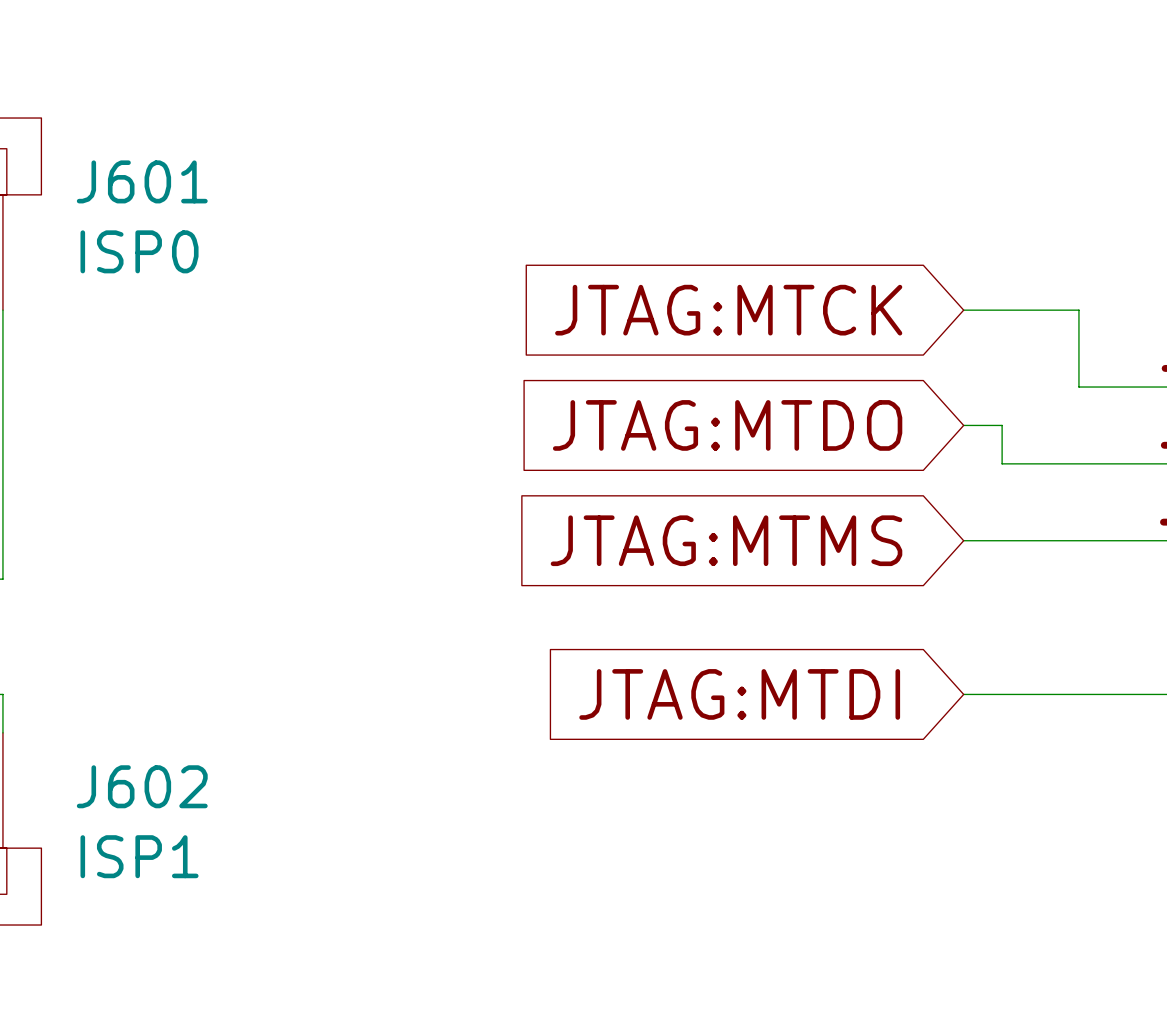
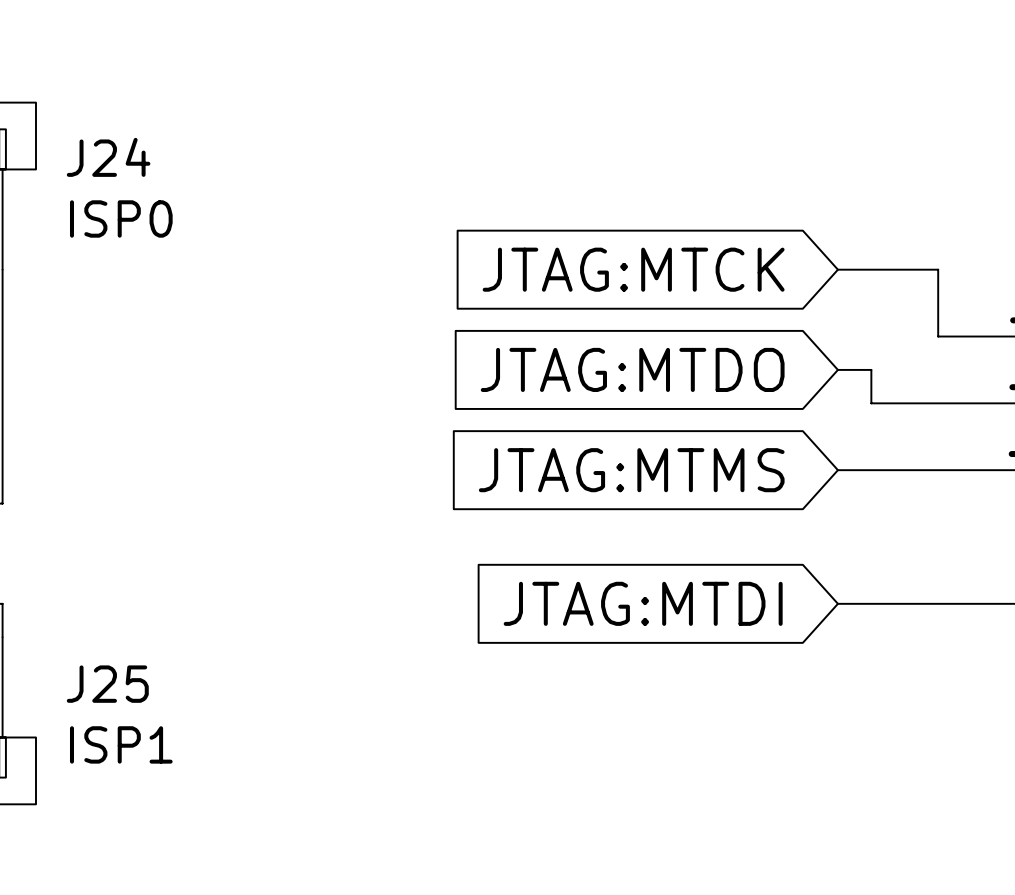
J601 name: J601 (142, 181) -> J24 (108, 157)
J602 name: J602 (142, 786) -> J25 (107, 684)

